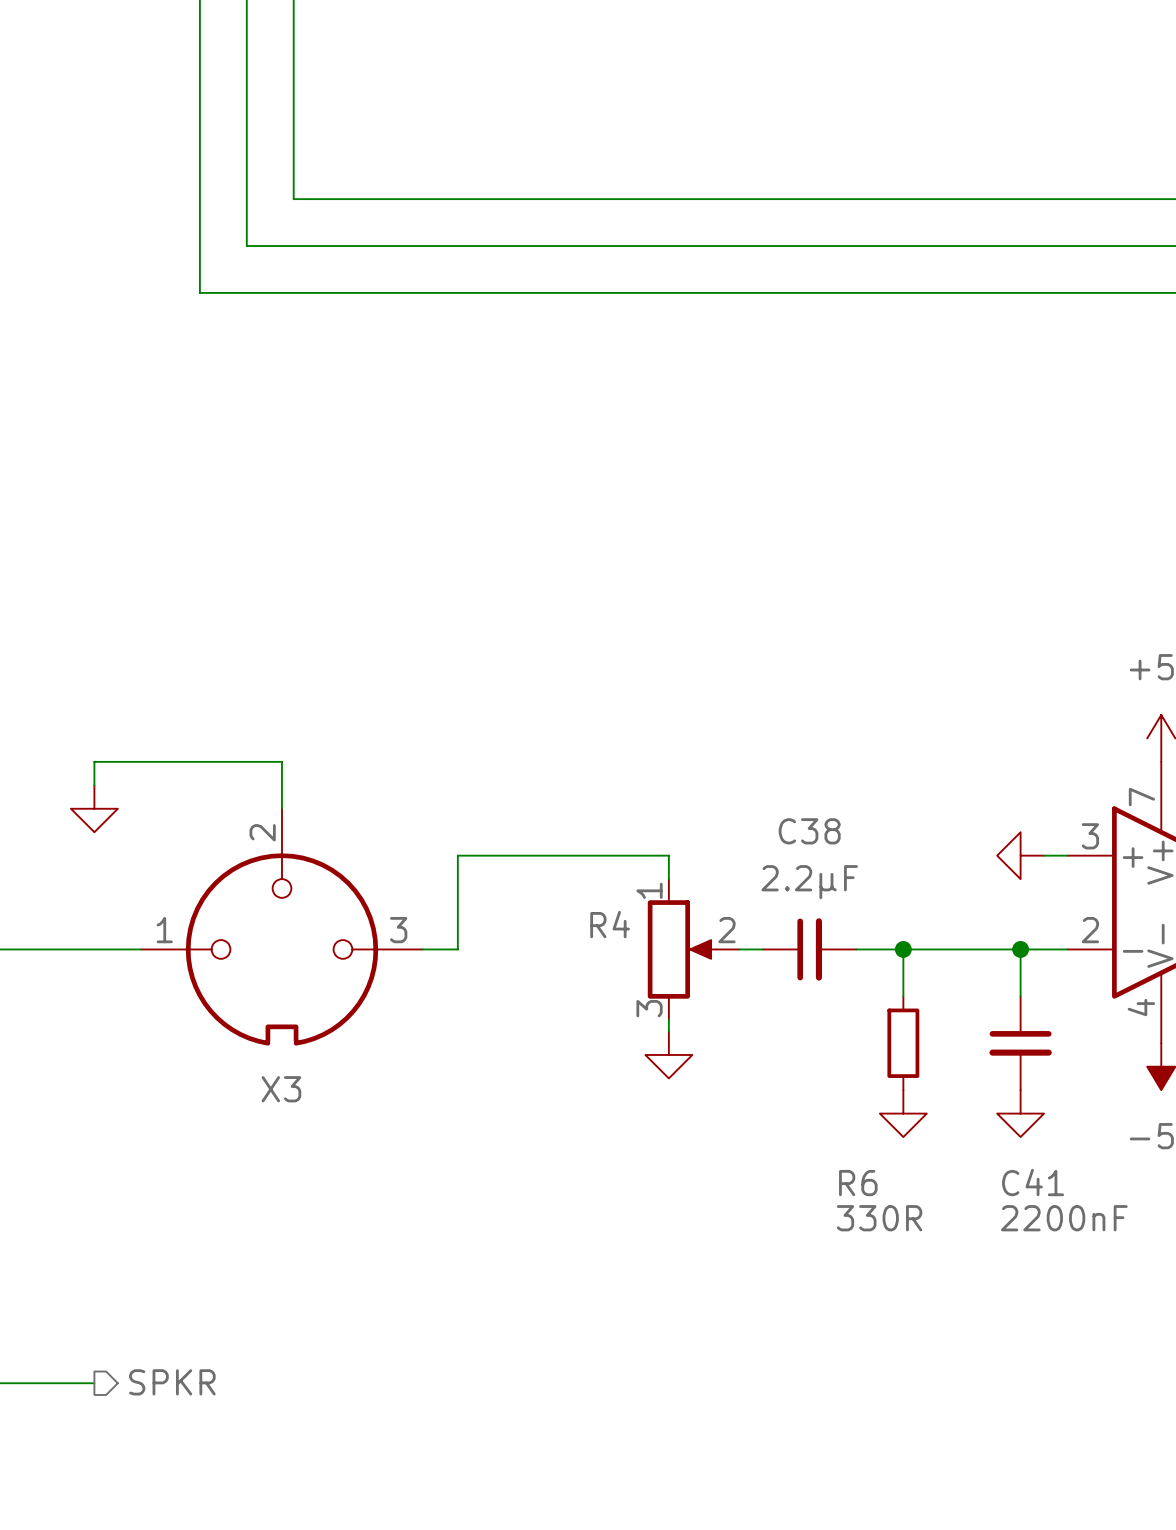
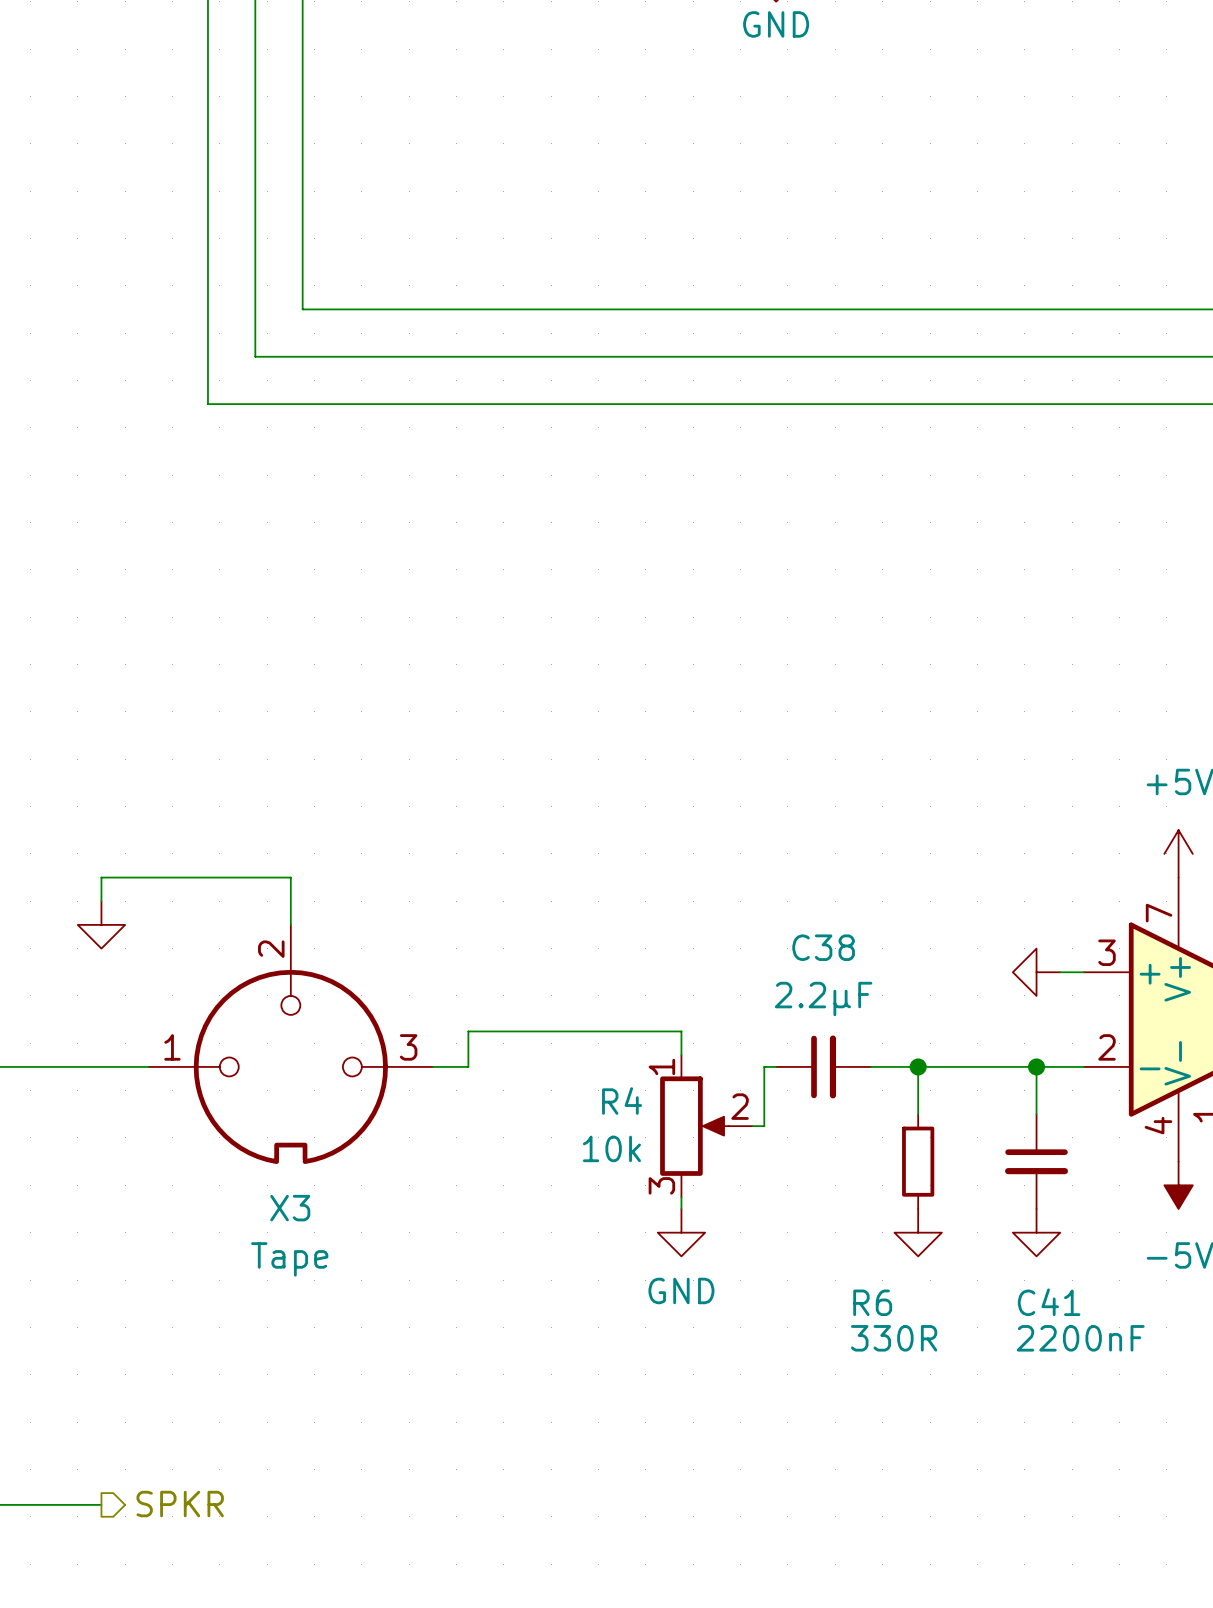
wire: (668, 879) (668, 855) (457, 855) (457, 914) -> (681, 1055) (681, 1031) (468, 1031)
R4 position: (693, 949) -> (706, 1126)
wire: (739, 949) (750, 949) -> (752, 1126) (764, 1126) (764, 1066)
wire: (668, 1019) (668, 1031) -> (681, 1197) (681, 1209)
R4 value: none -> 10k (611, 1148)
power symbol: (668, 1054) -> none
power symbol: none -> GND (681, 1232)
X3 value: none -> Tape (289, 1259)

